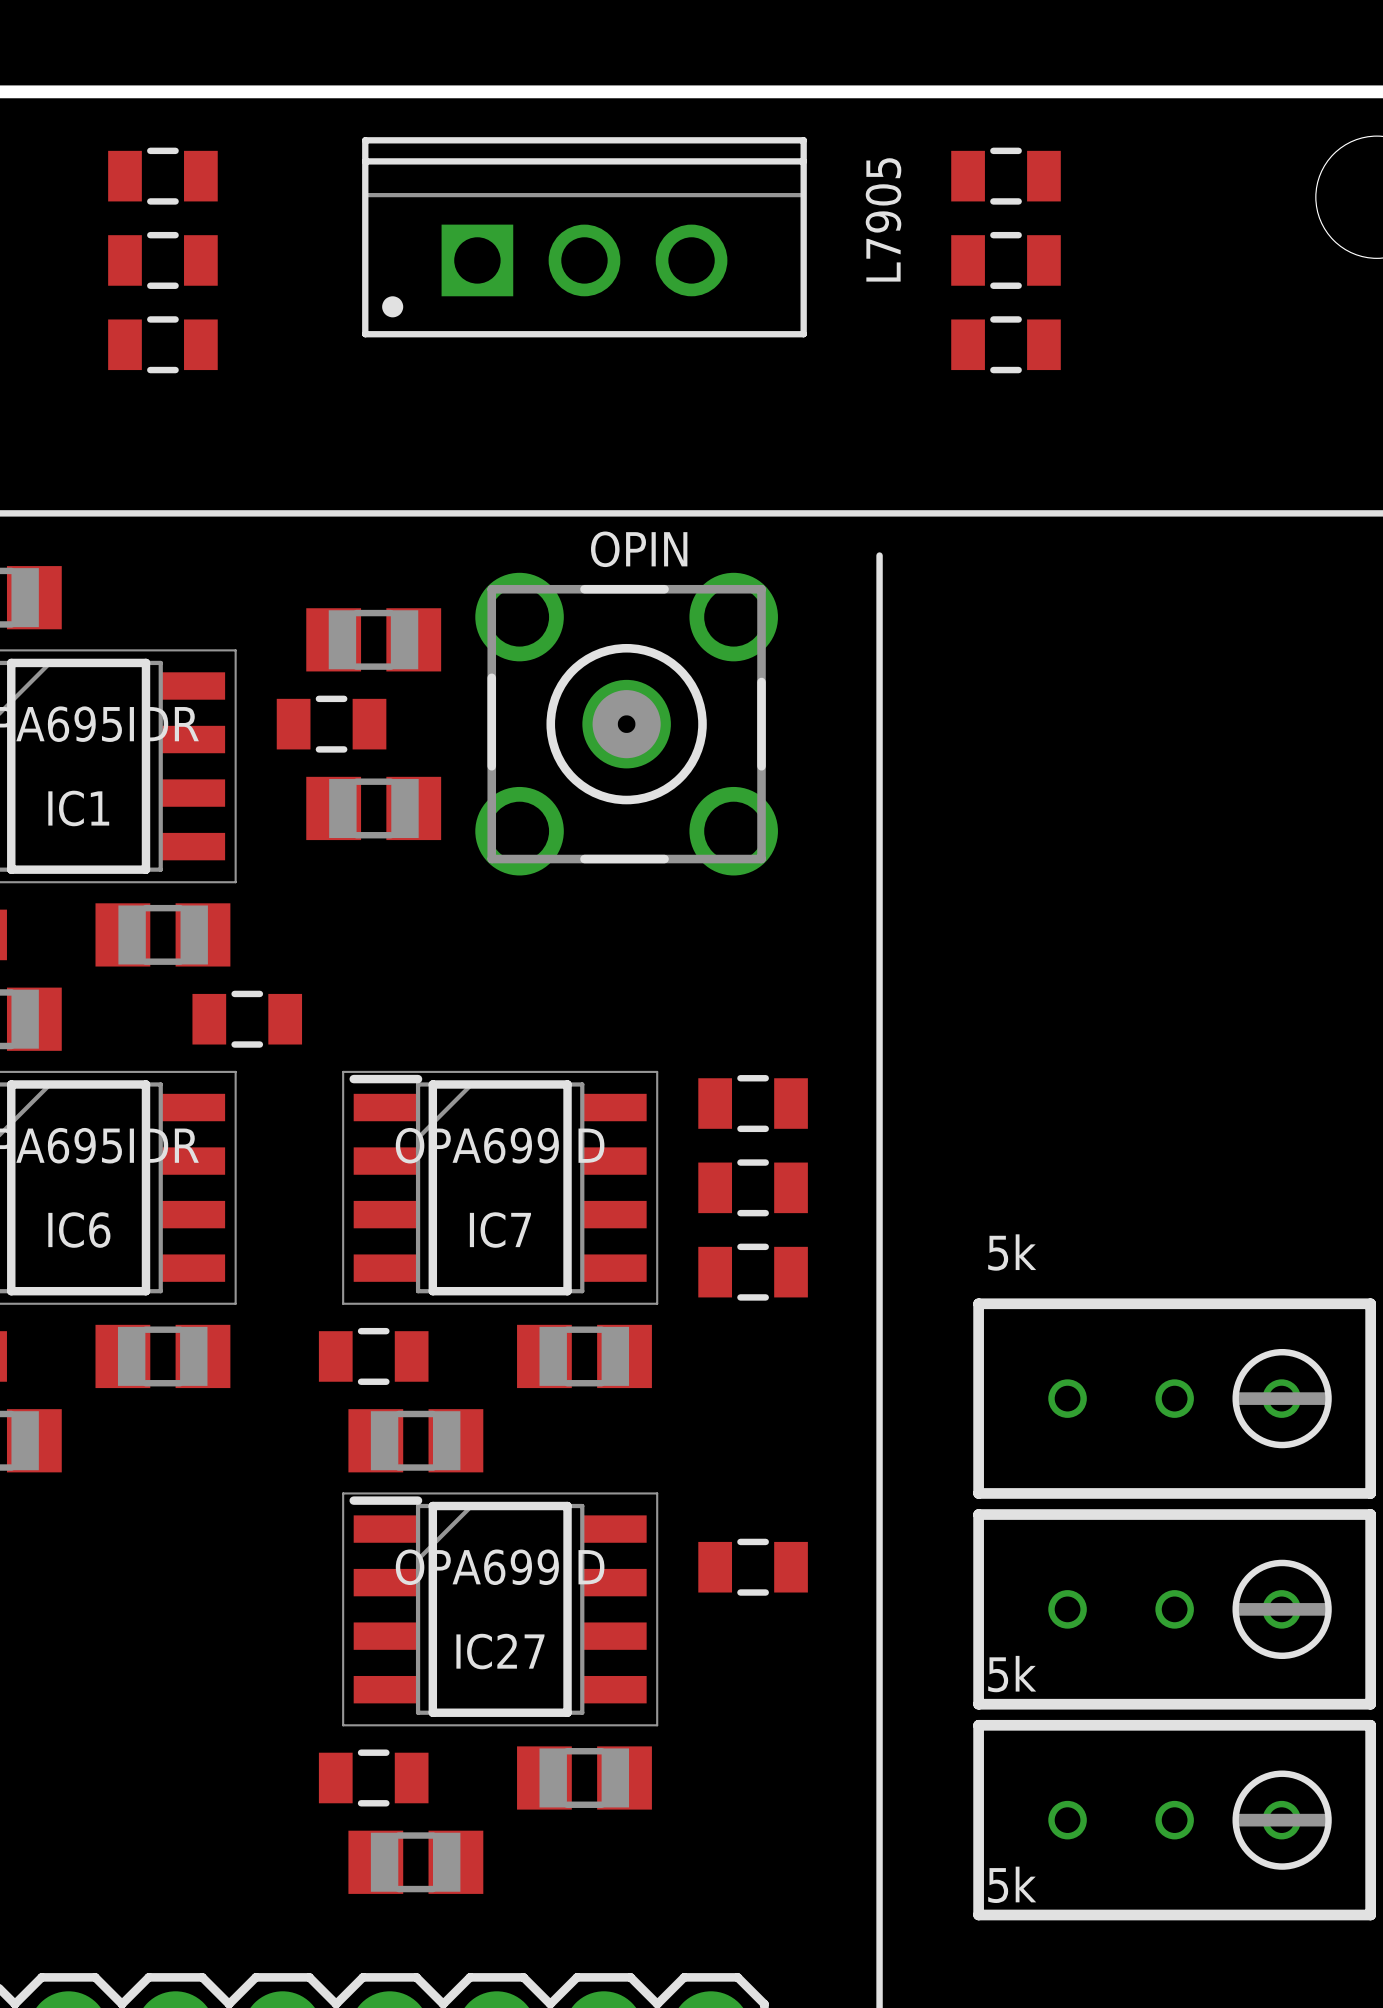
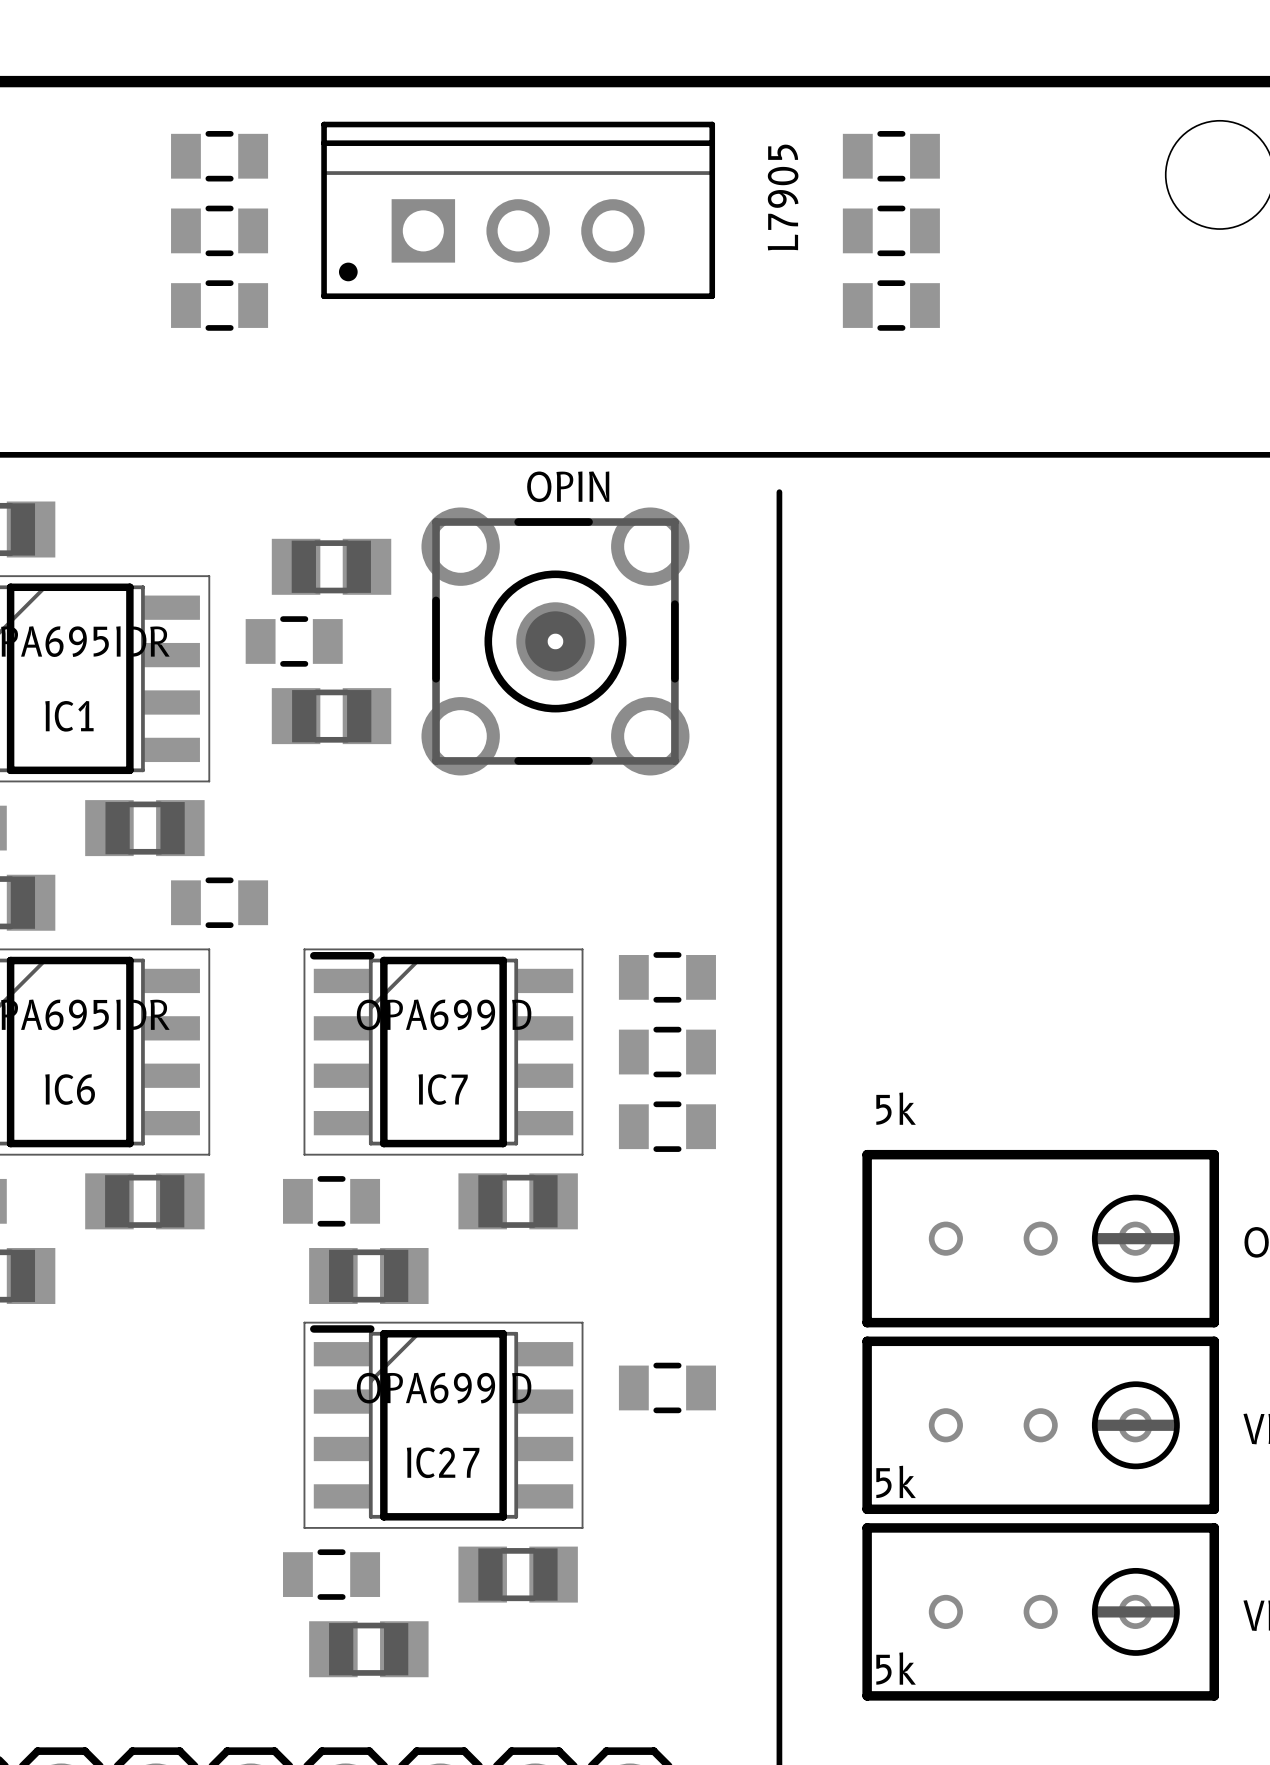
part: (162, 176) -> none
part: none -> (219, 156)
part: (162, 260) -> none
part: none -> (219, 230)
part: (162, 344) -> none
part: none -> (219, 305)

